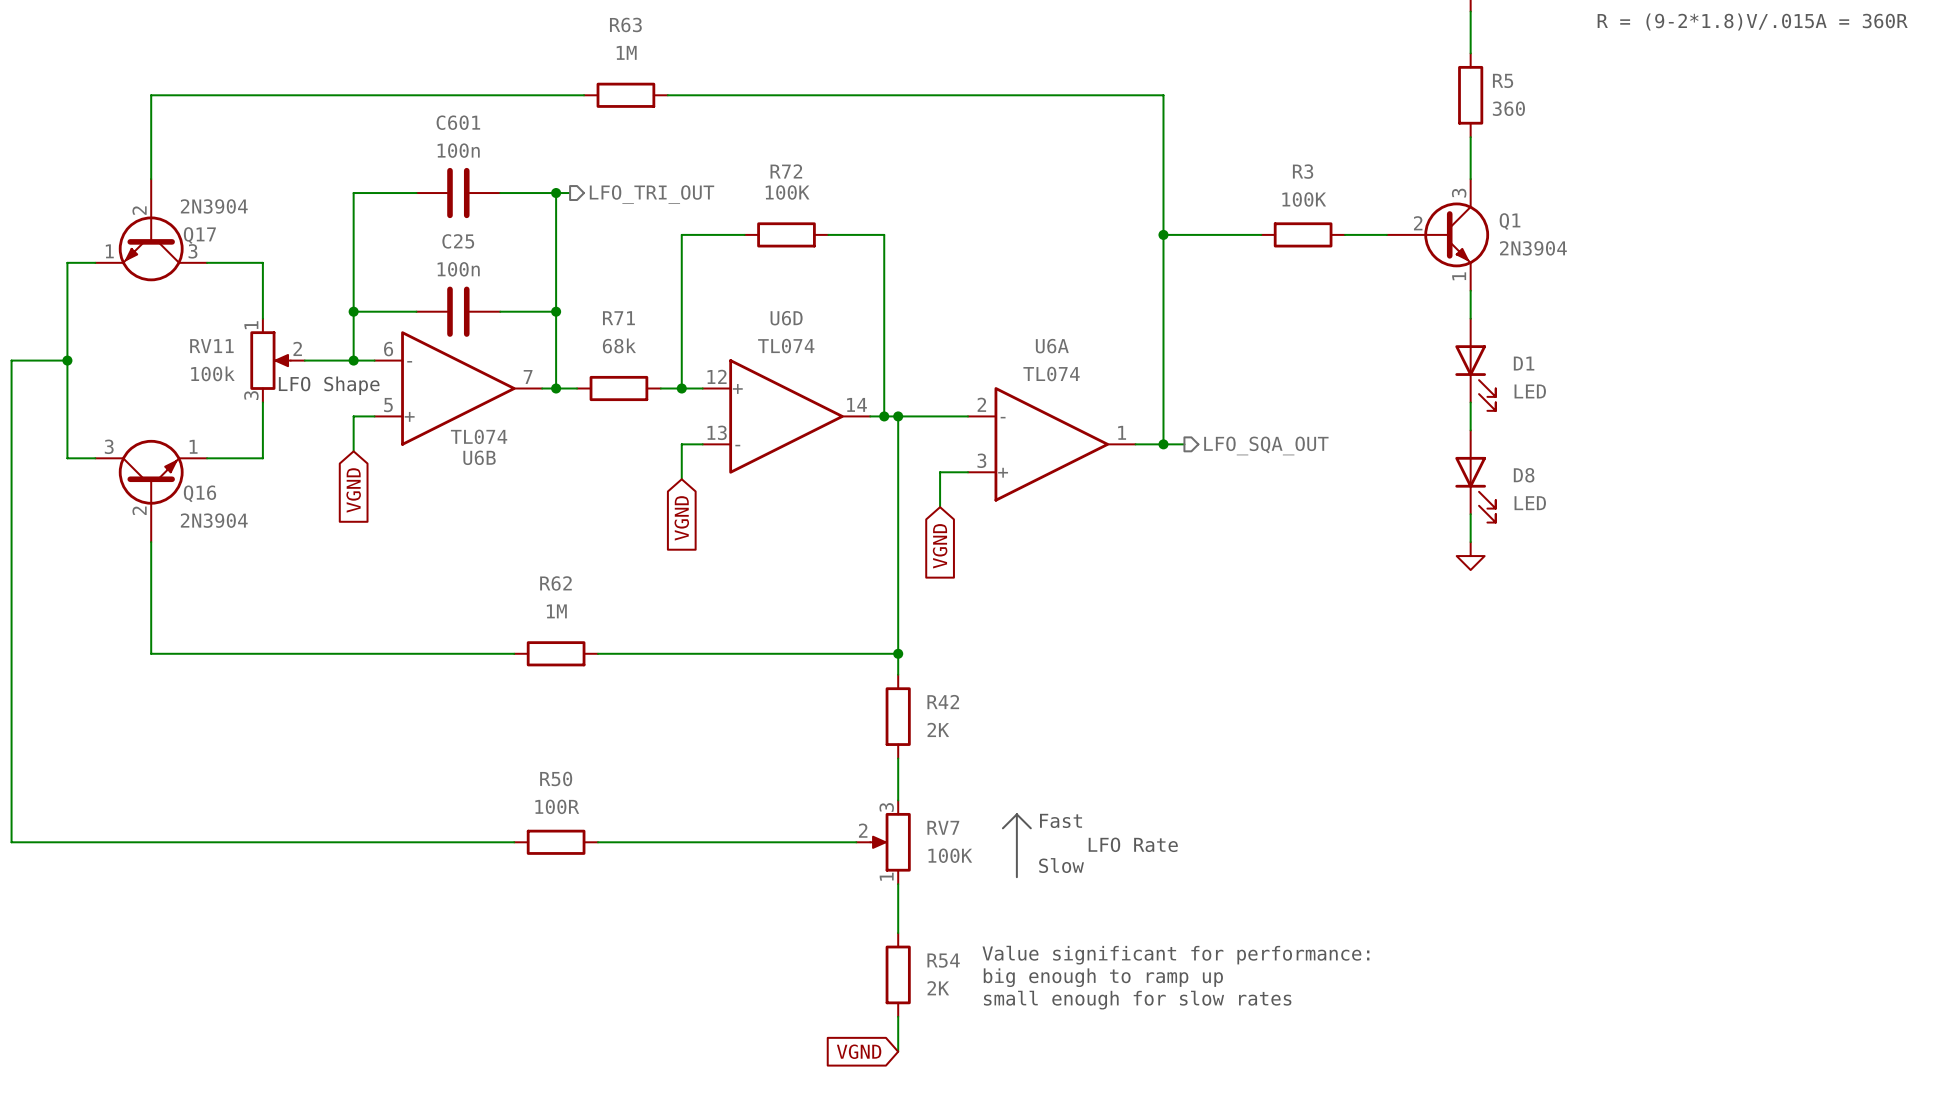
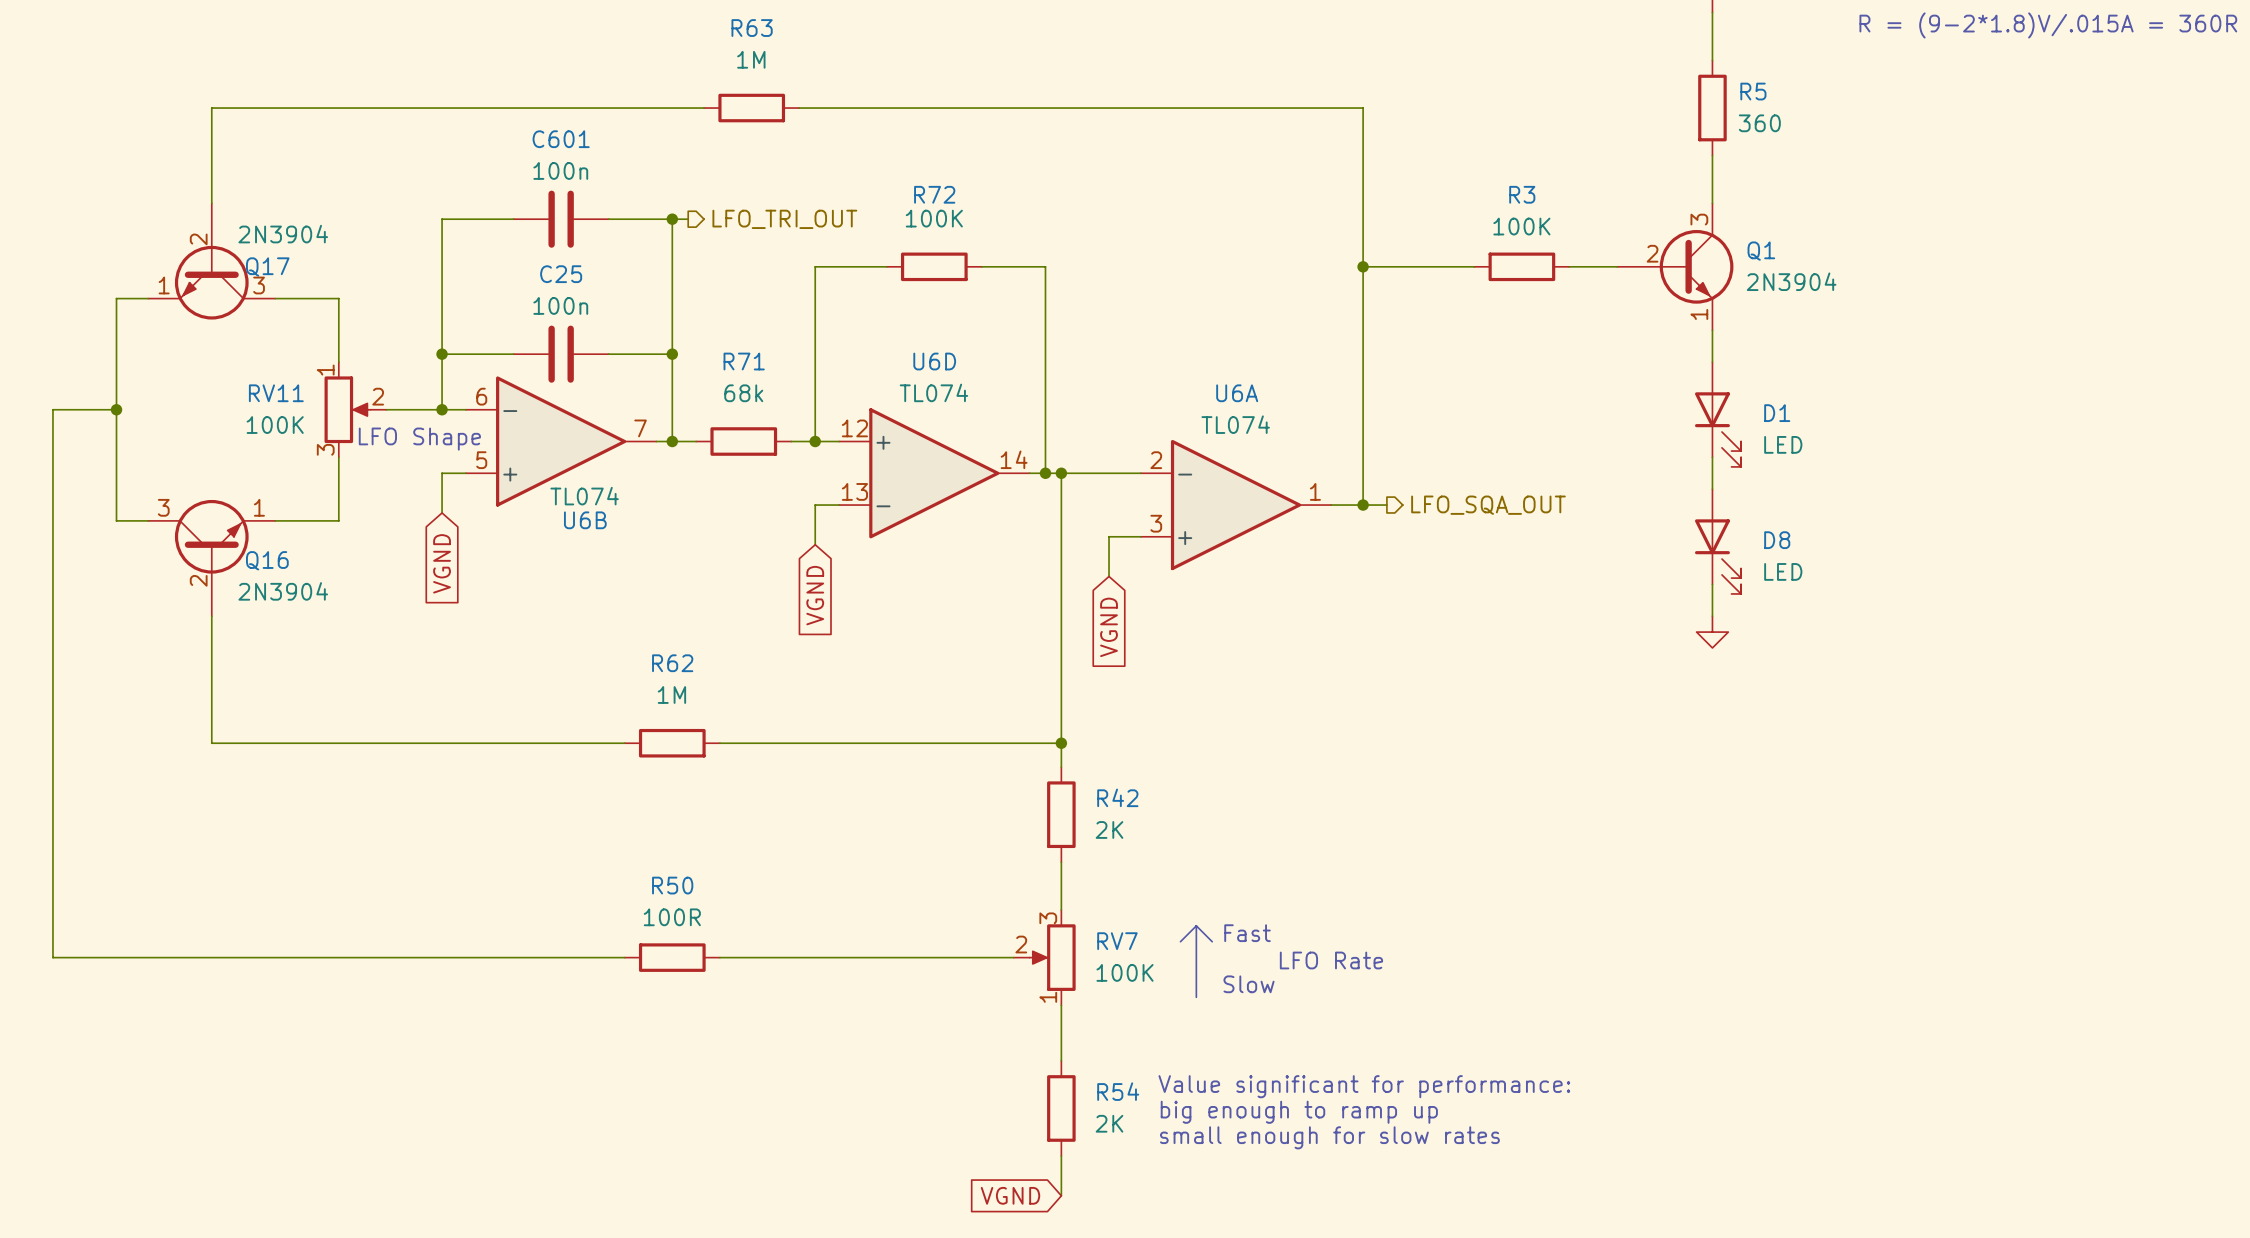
RV11 value: 100k (212, 373) -> 100K (275, 425)

